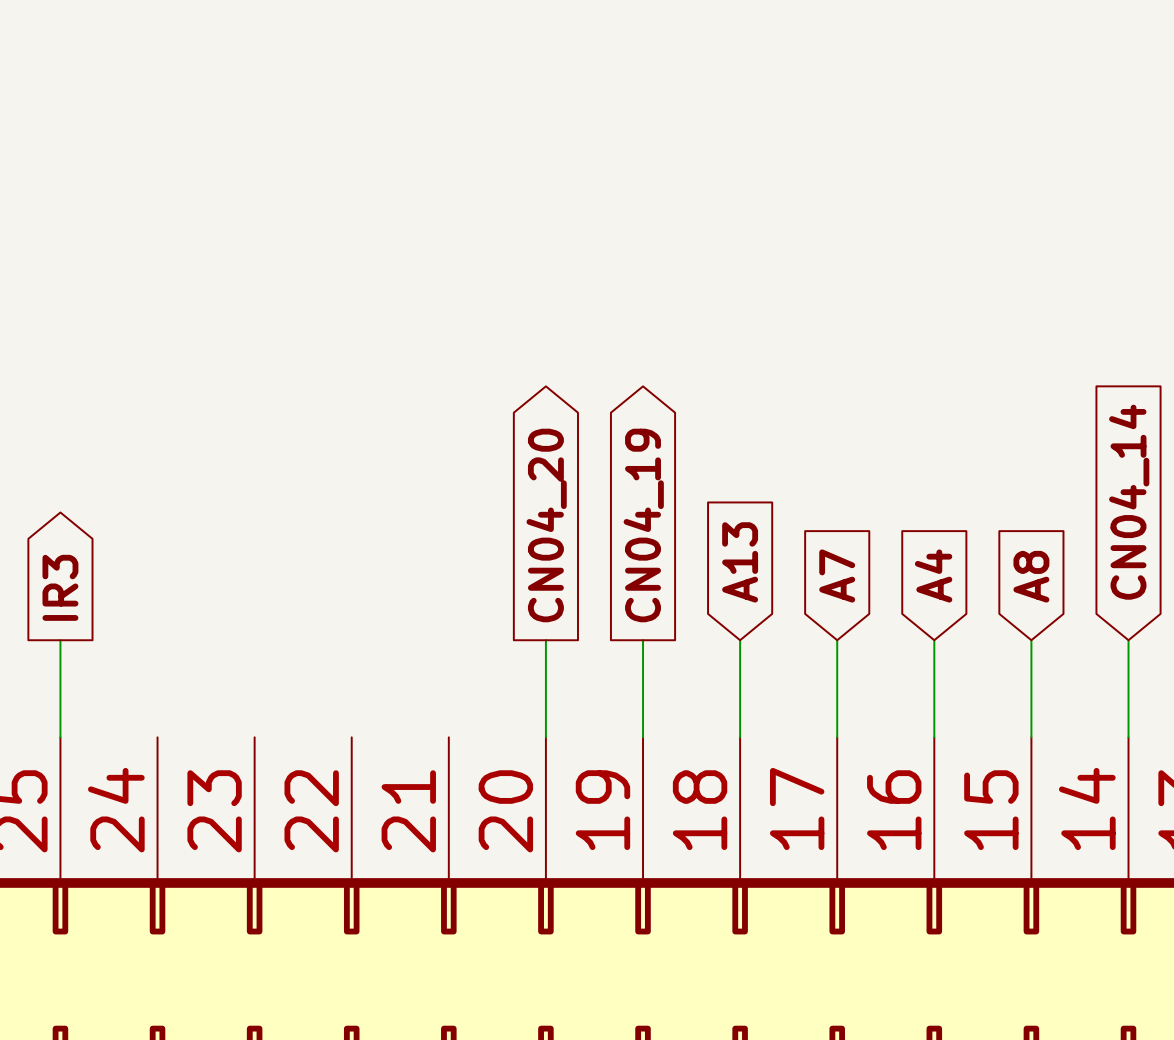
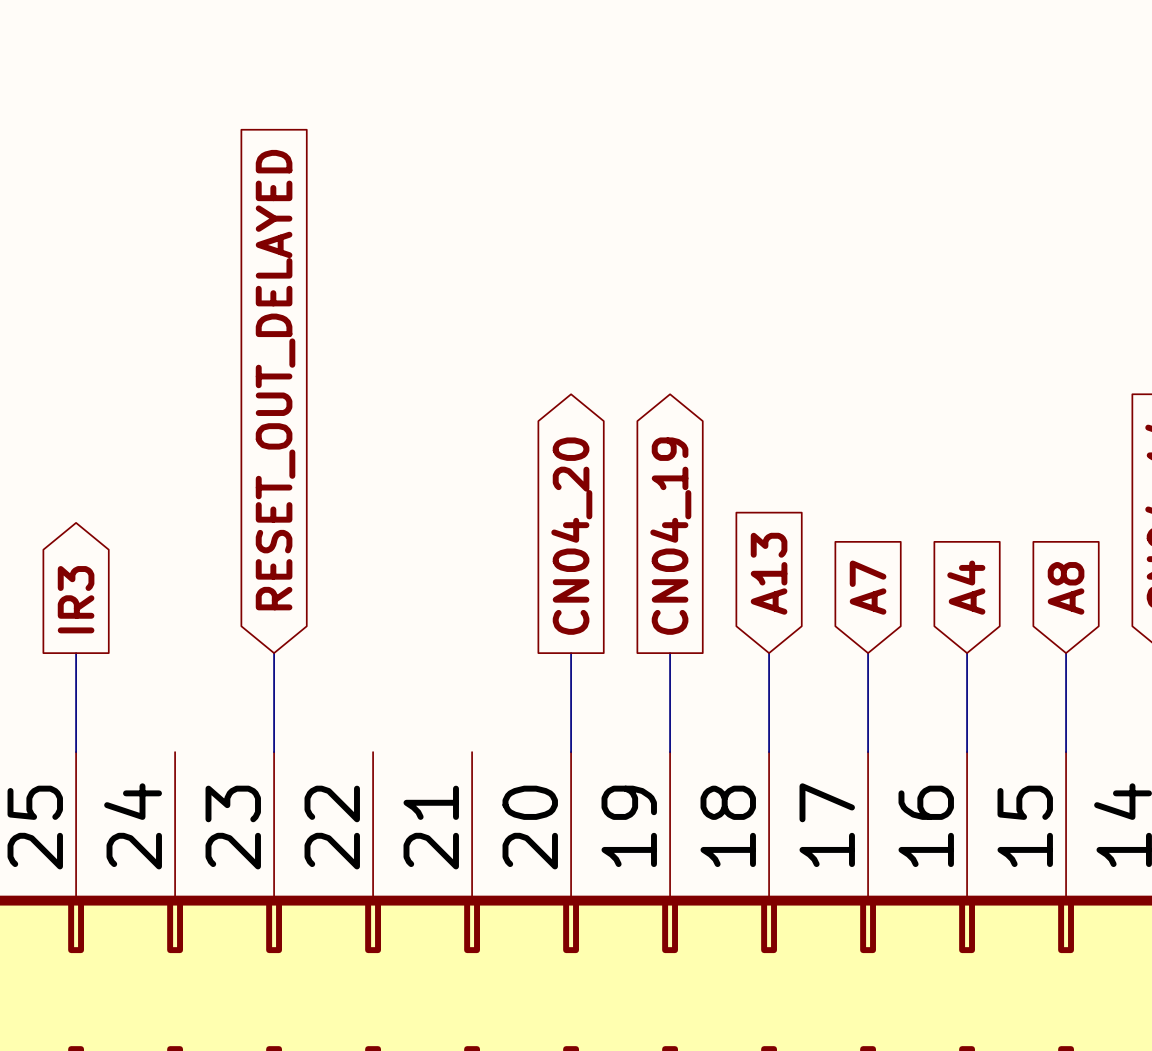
global label: none -> RESET_OUT_DELAYED (275, 380)
wire: none -> (274, 653) (274, 752)

